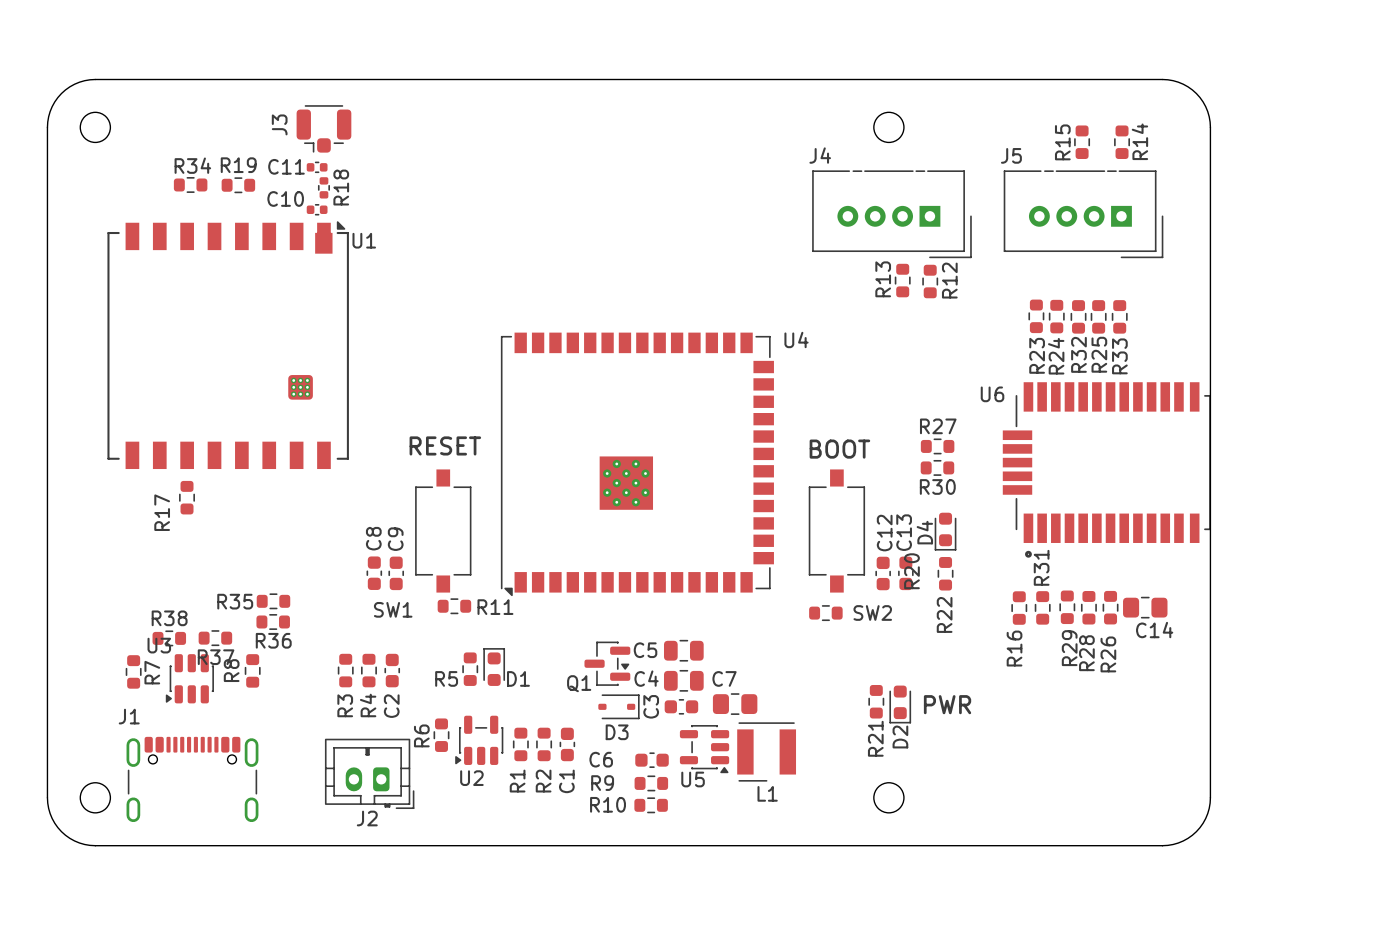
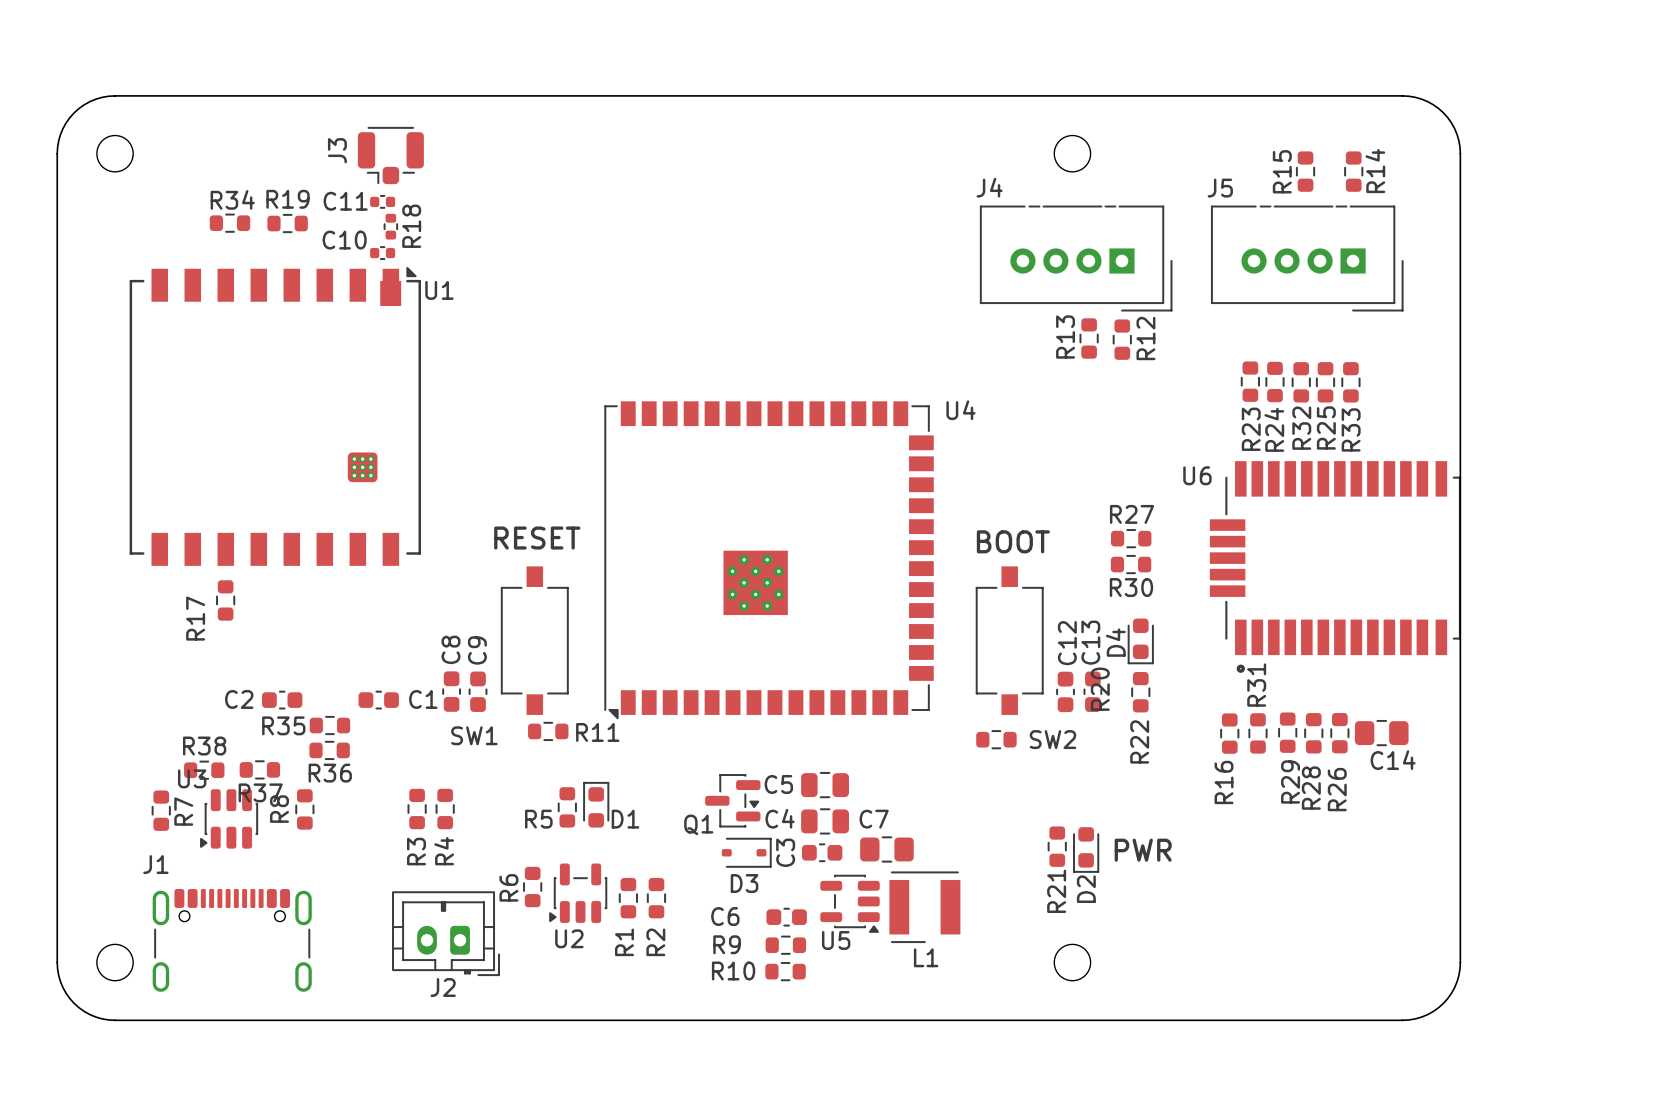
C2 rotation: 0° (392, 670) -> 90° clockwise (282, 700)
C2 position: (392, 670) -> (282, 700)
C1 rotation: 0° (567, 744) -> 90° clockwise (378, 700)
C1 position: (567, 744) -> (378, 700)
C1 name position: C1 (566, 781) -> C1 (423, 699)

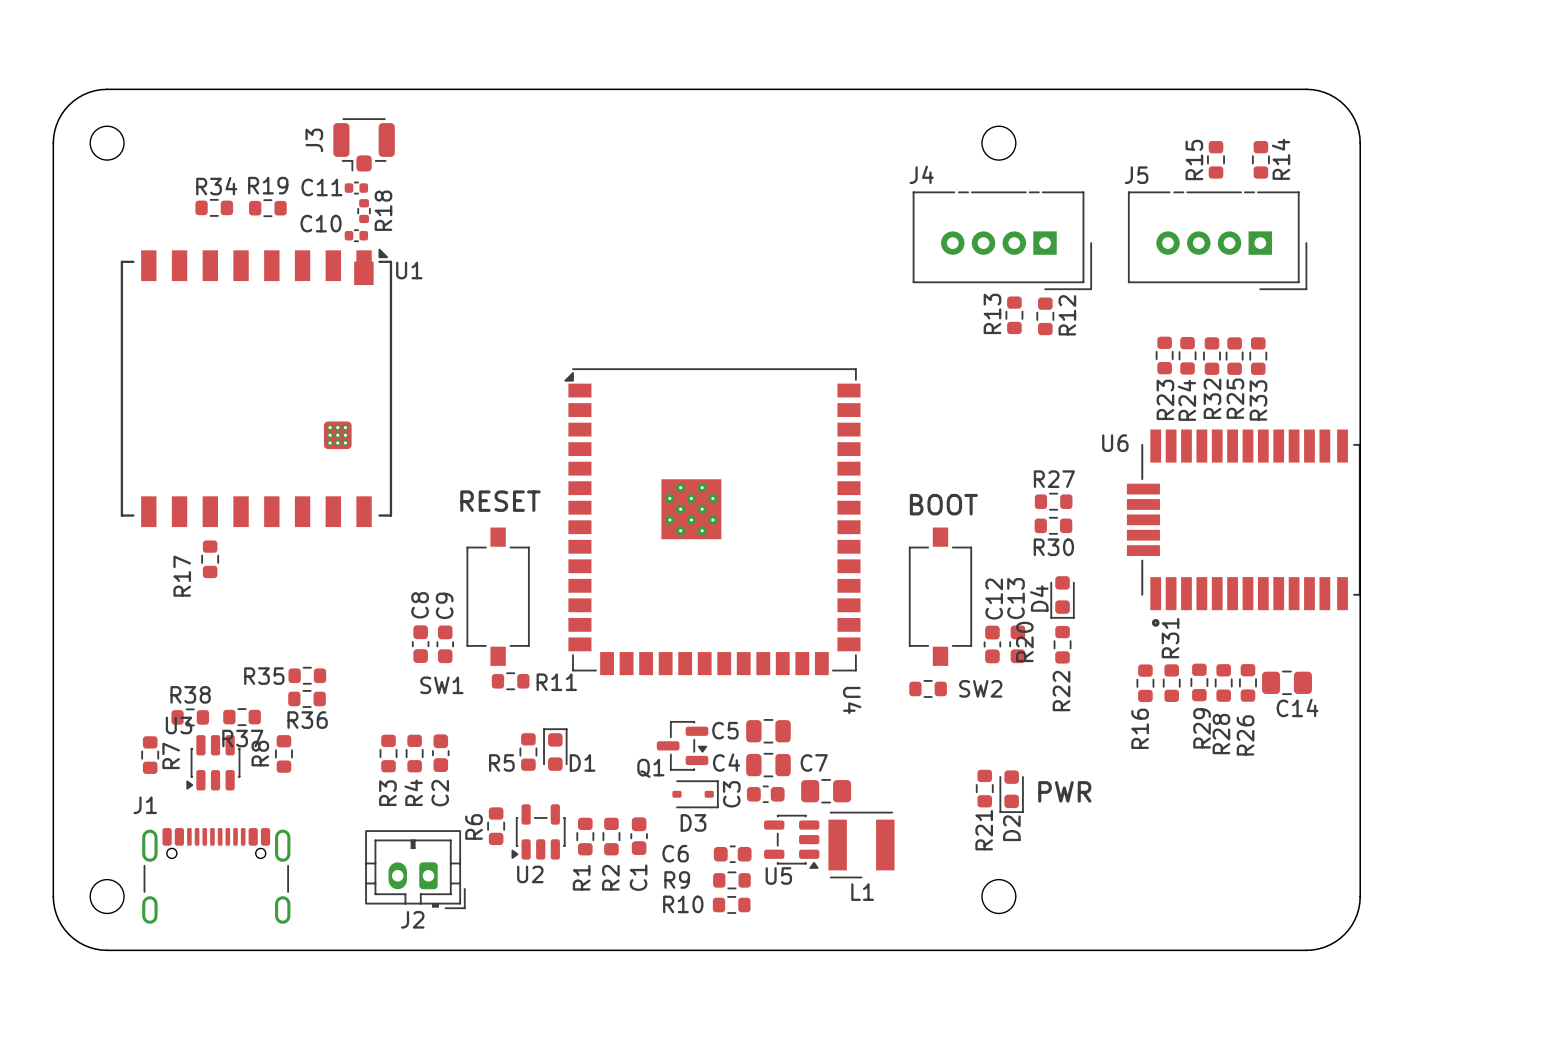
U4 rotation: 0° (769, 560) -> 90° clockwise (712, 521)
C2 name position: C2 (239, 699) -> C2 (440, 793)
C2 rotation: 0° (282, 700) -> 90° clockwise (440, 753)
C2 position: (282, 700) -> (440, 753)
C1 rotation: 0° (378, 700) -> 90° clockwise (639, 836)
C1 position: (378, 700) -> (639, 836)

